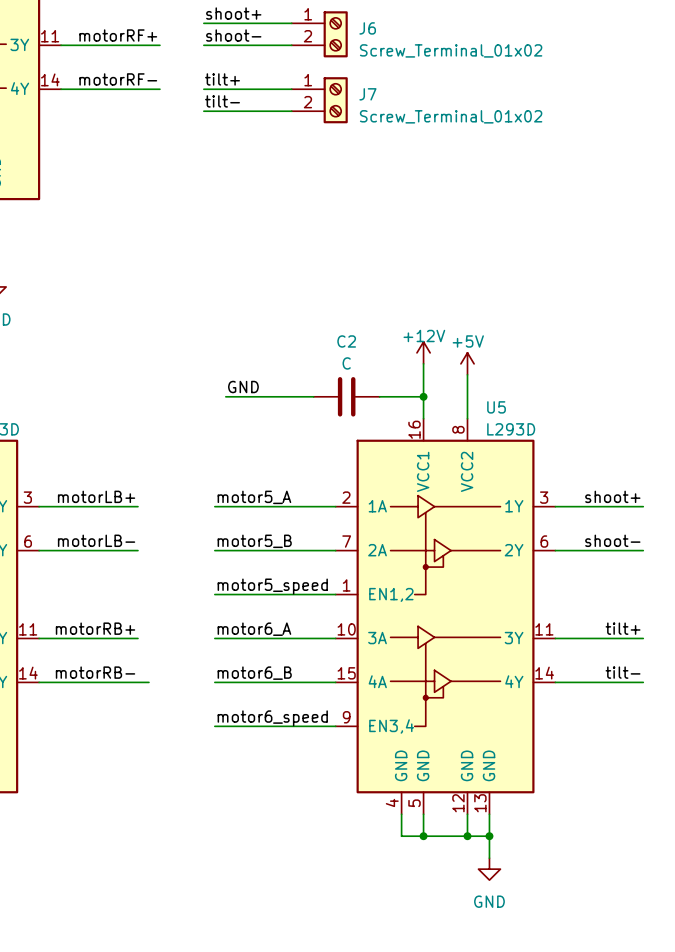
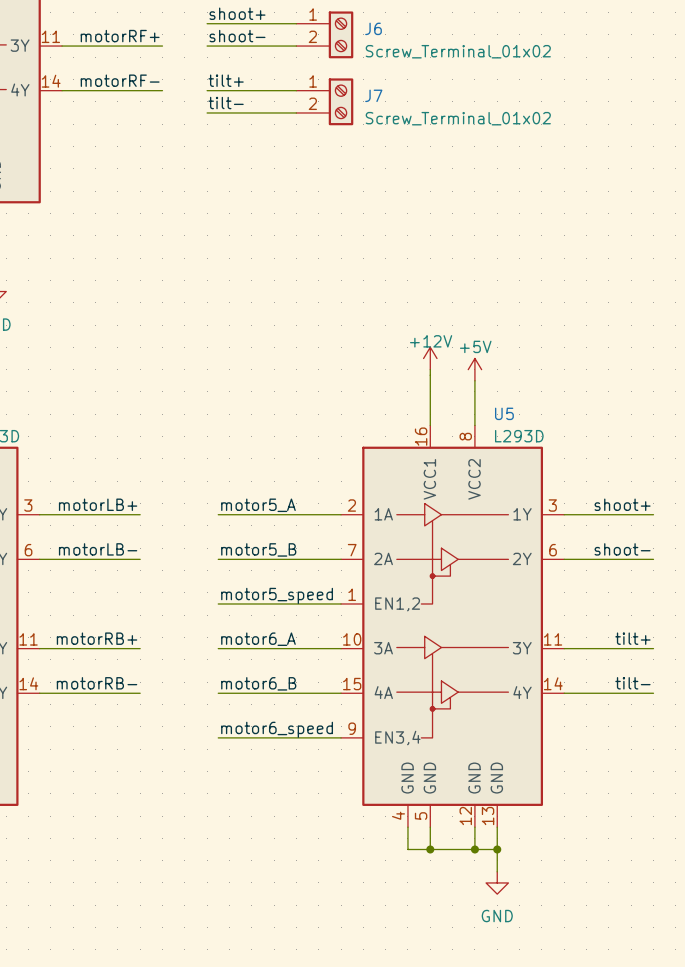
label: GND (243, 387) -> none
wire: (225, 396) (313, 396) -> none
C2: C (346, 396) -> none
wire: (379, 396) (423, 396) -> none
junction: (423, 396) -> none
wire: (137, 682) (148, 682) -> none

